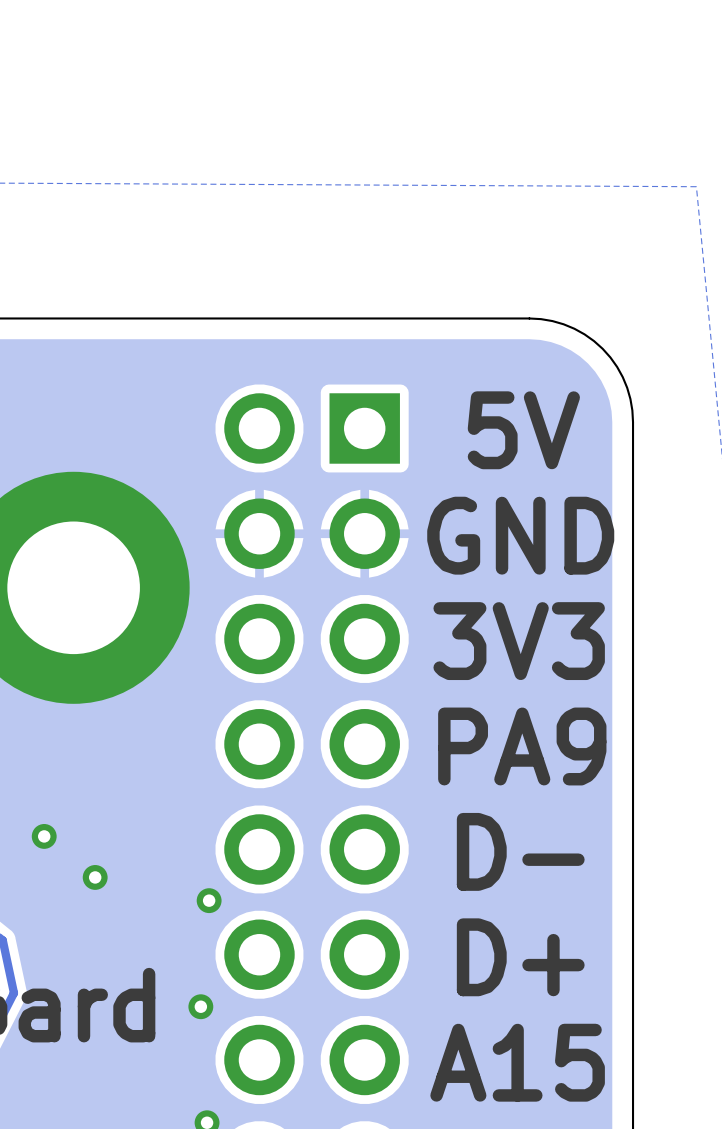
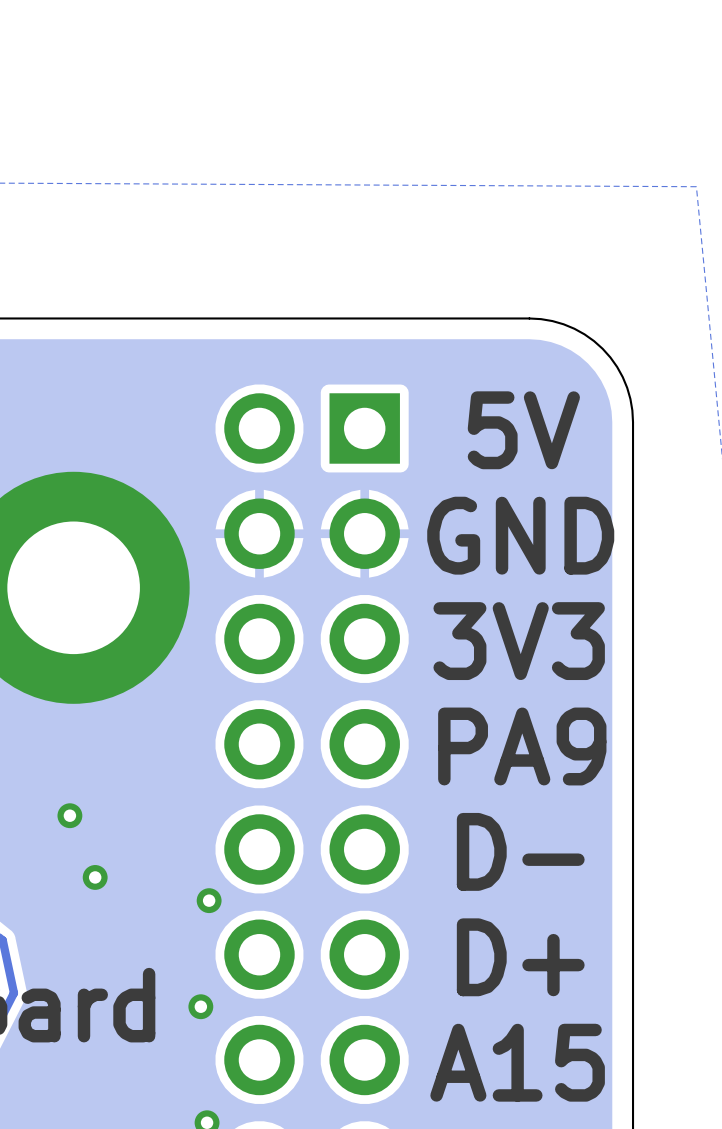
via position: (44, 836) -> (69, 815)

